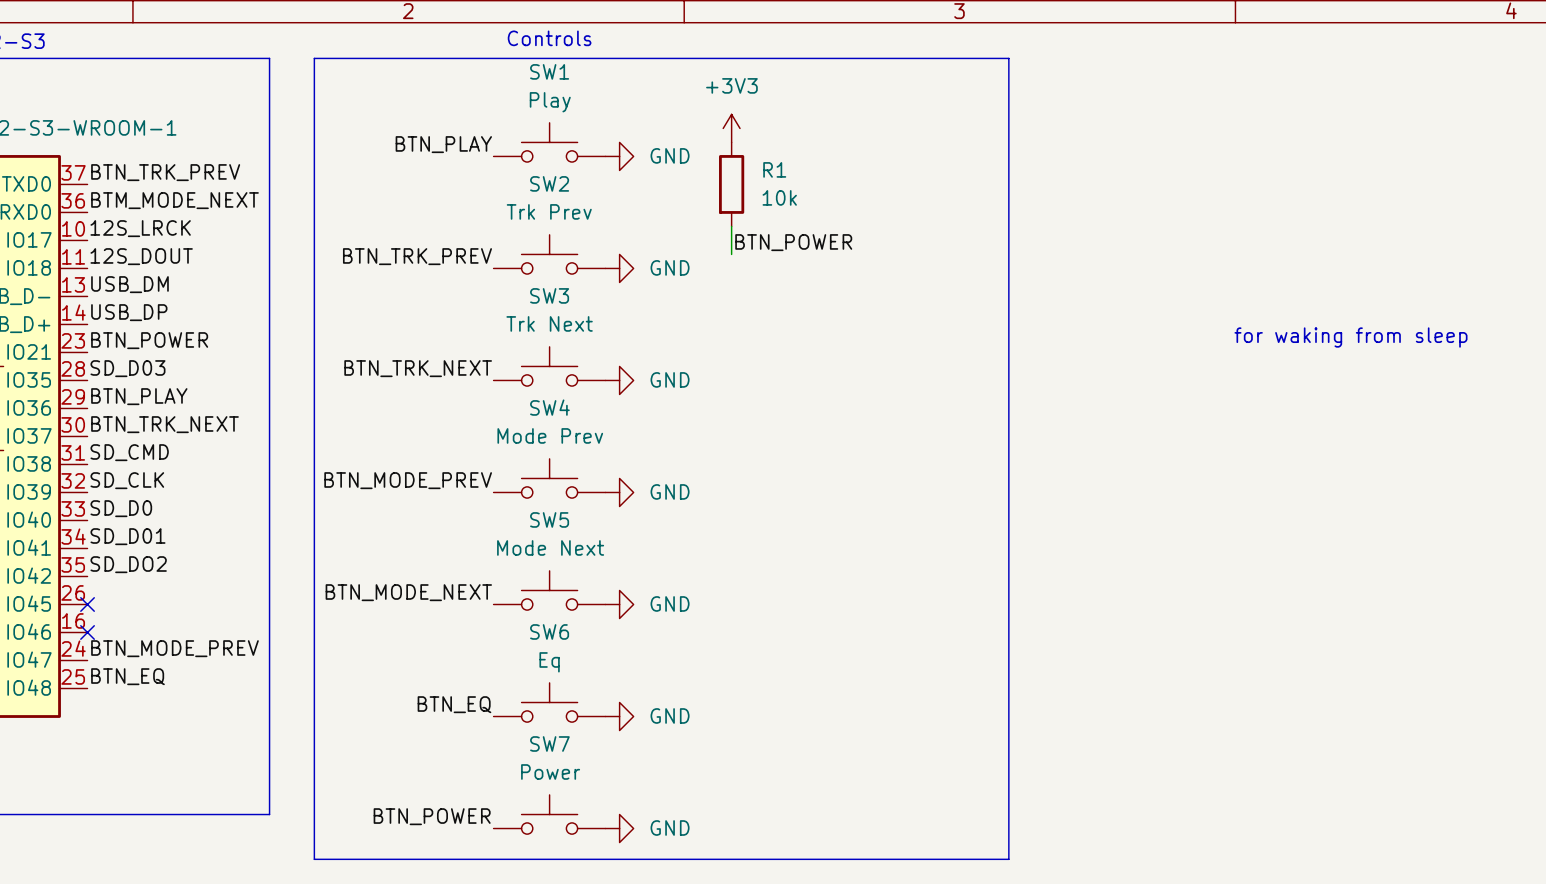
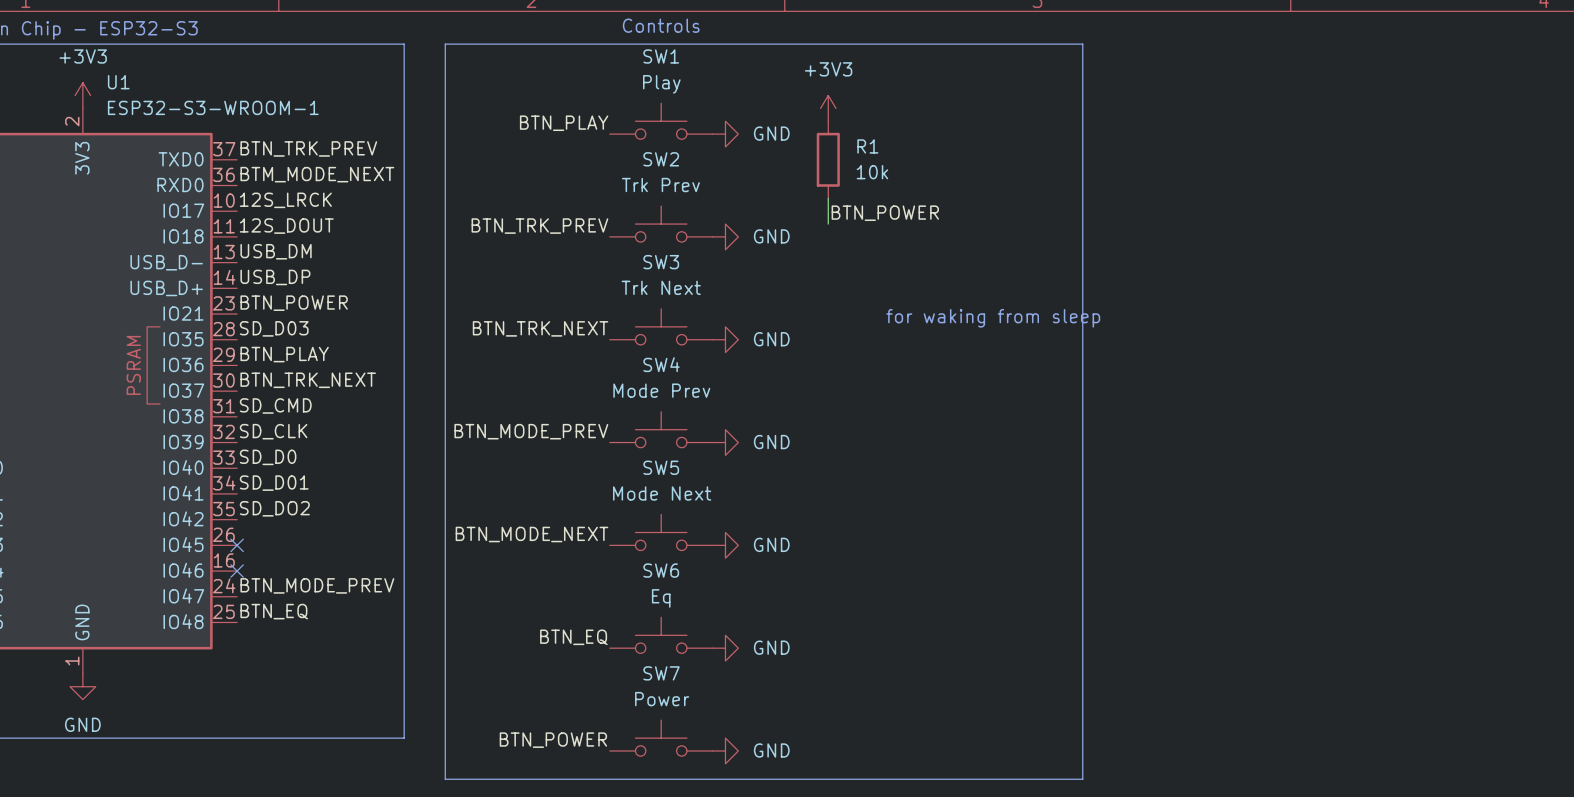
text: for waking from sleep (1351, 337) -> none
text: none -> for waking from sleep (993, 318)

